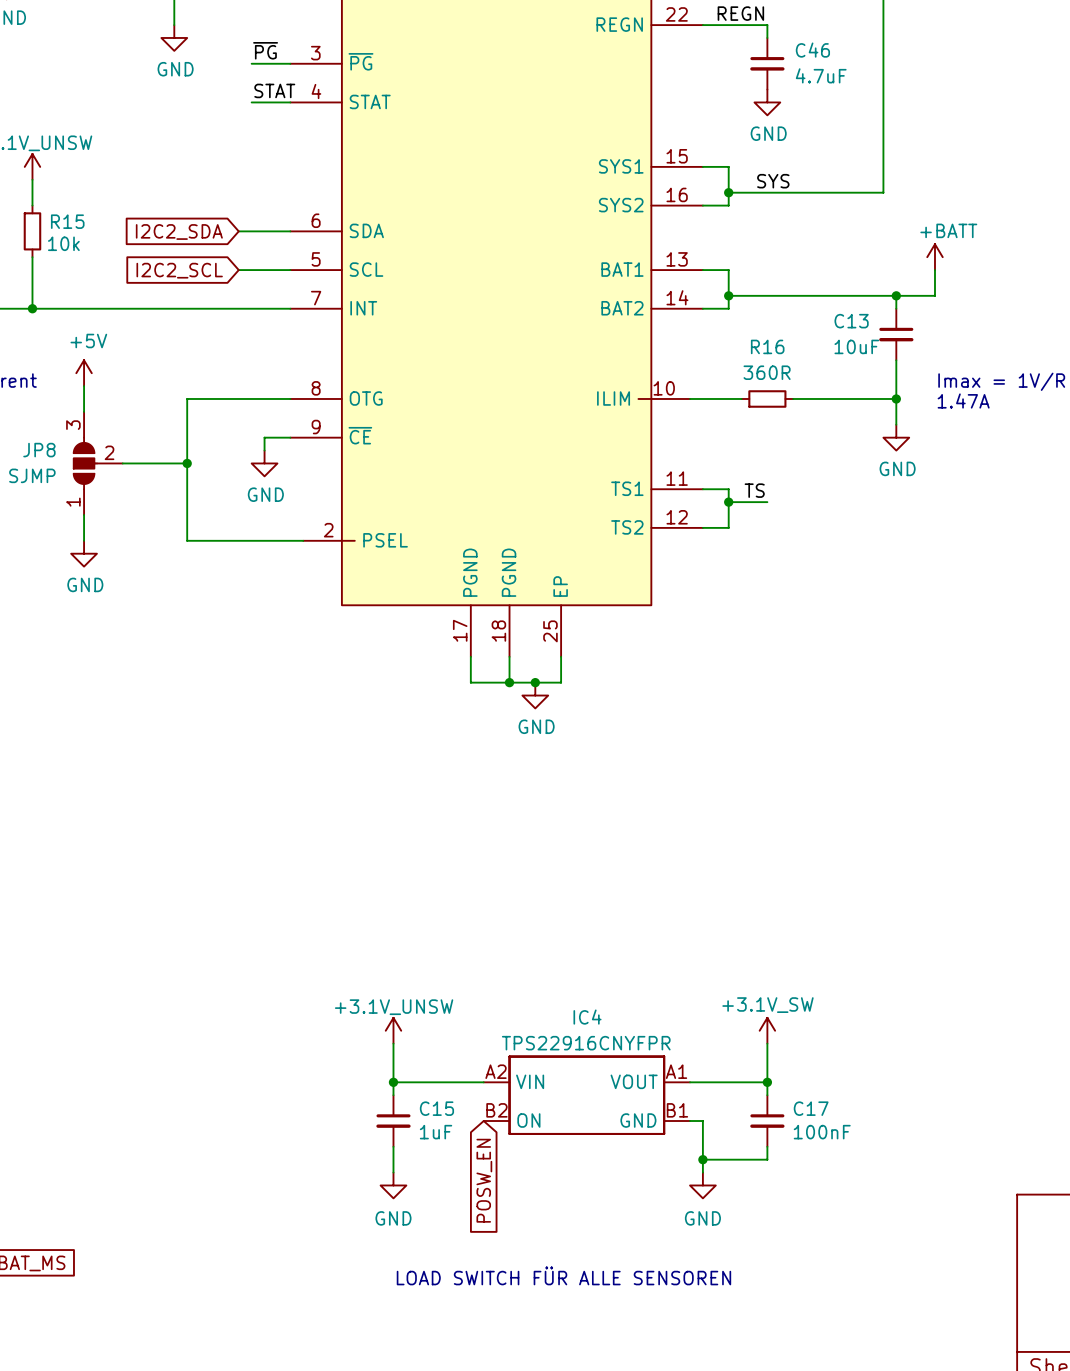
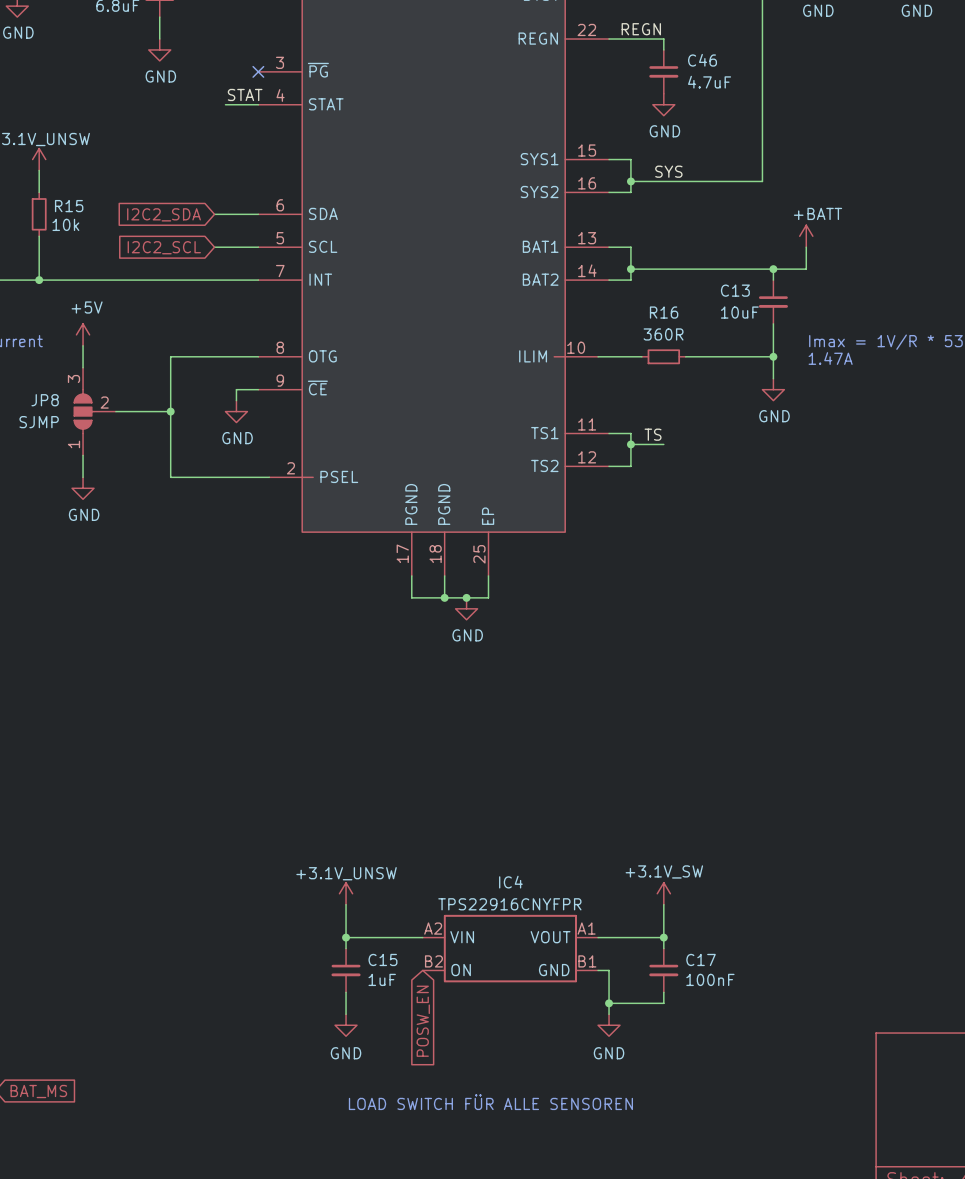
label: ~{PG} (265, 50) -> none
wire: (251, 63) (290, 63) -> none
no-connect mark: none -> (258, 71)

